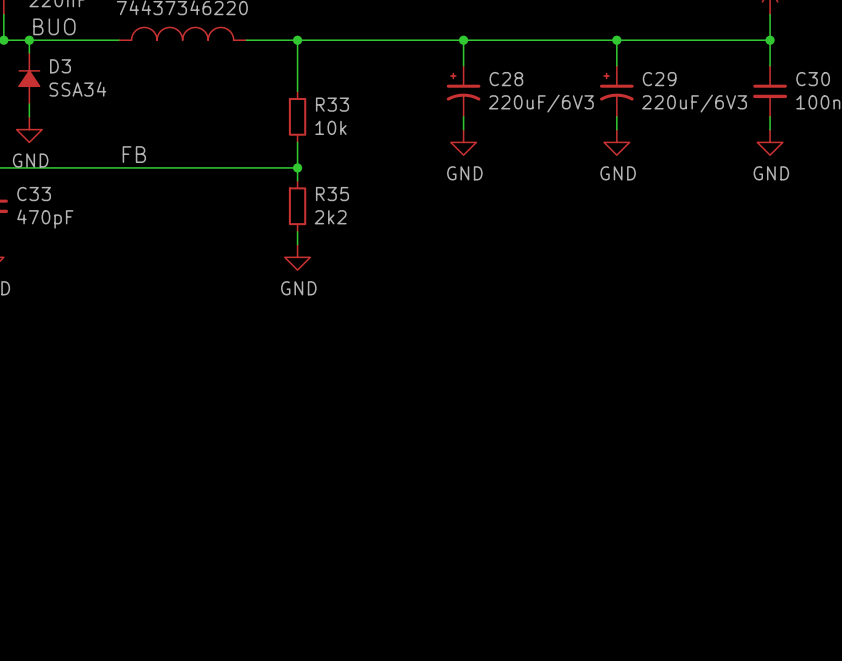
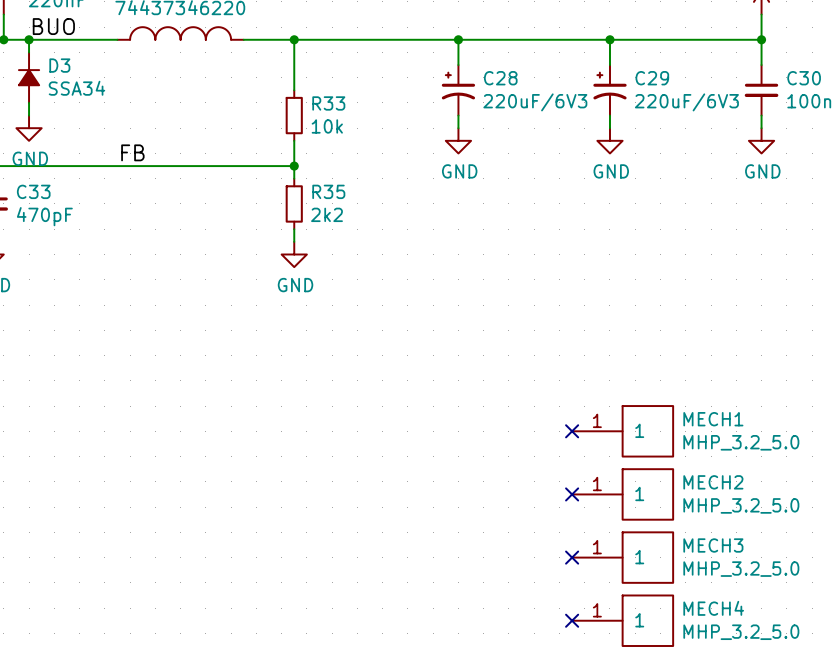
no-connect mark: none -> (572, 431)
MECH1: none -> MHP_3.2_5.0 (622, 431)
no-connect mark: none -> (572, 494)
MECH2: none -> MHP_3.2_5.0 (622, 494)
no-connect mark: none -> (572, 557)
MECH3: none -> MHP_3.2_5.0 (622, 557)
no-connect mark: none -> (572, 620)
MECH4: none -> MHP_3.2_5.0 (622, 620)

